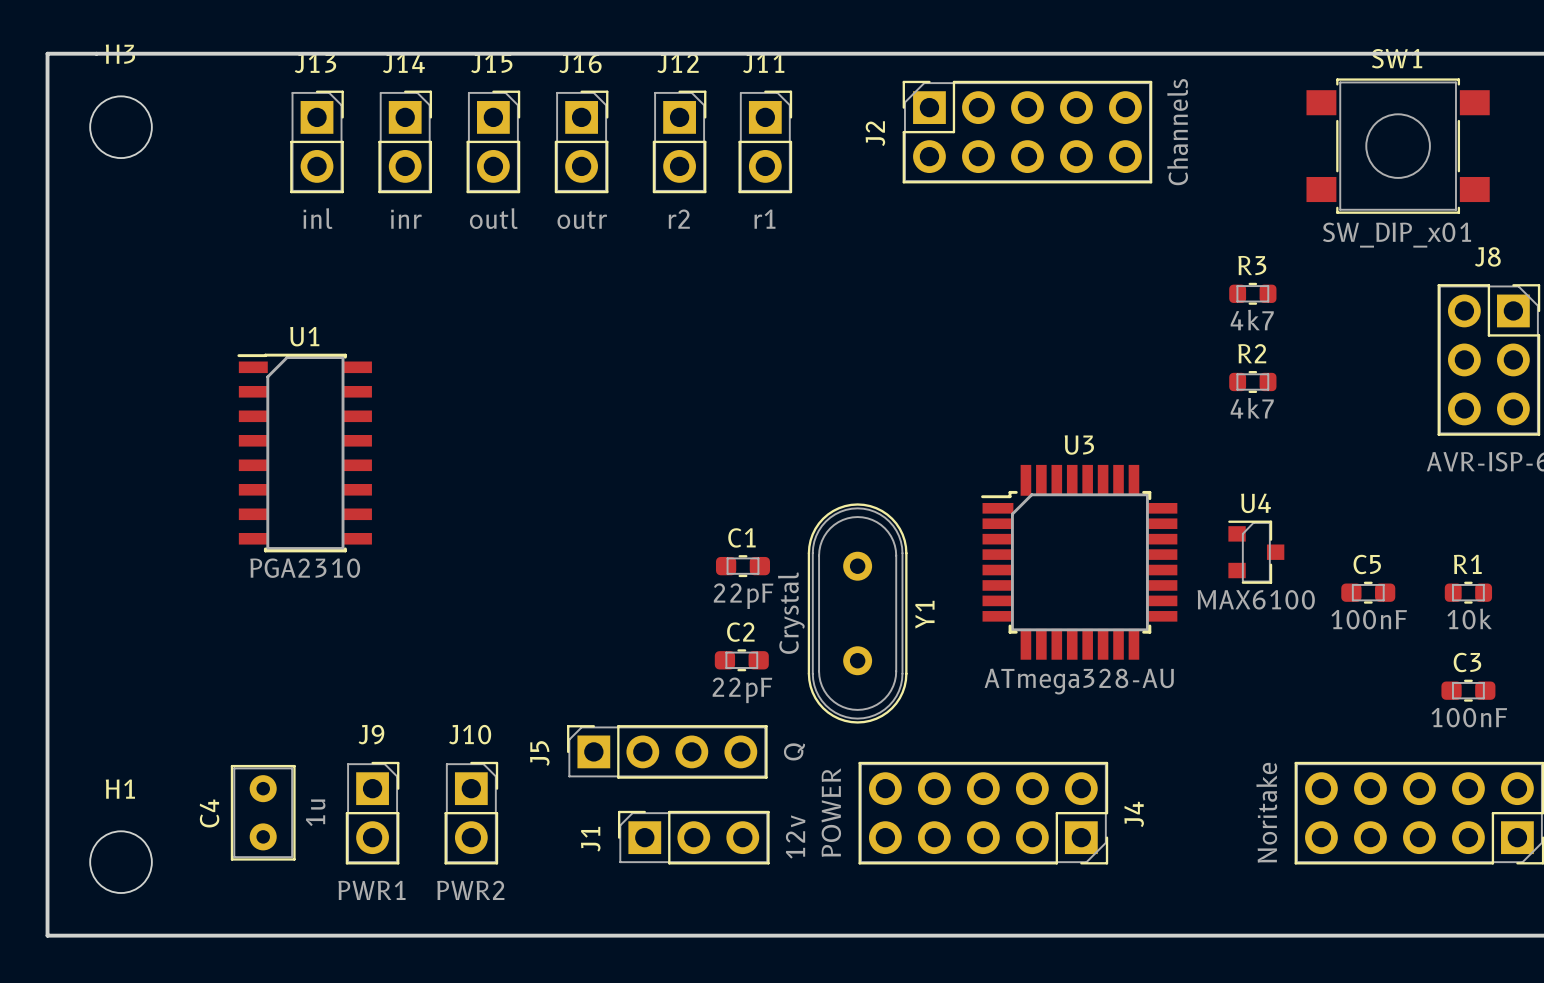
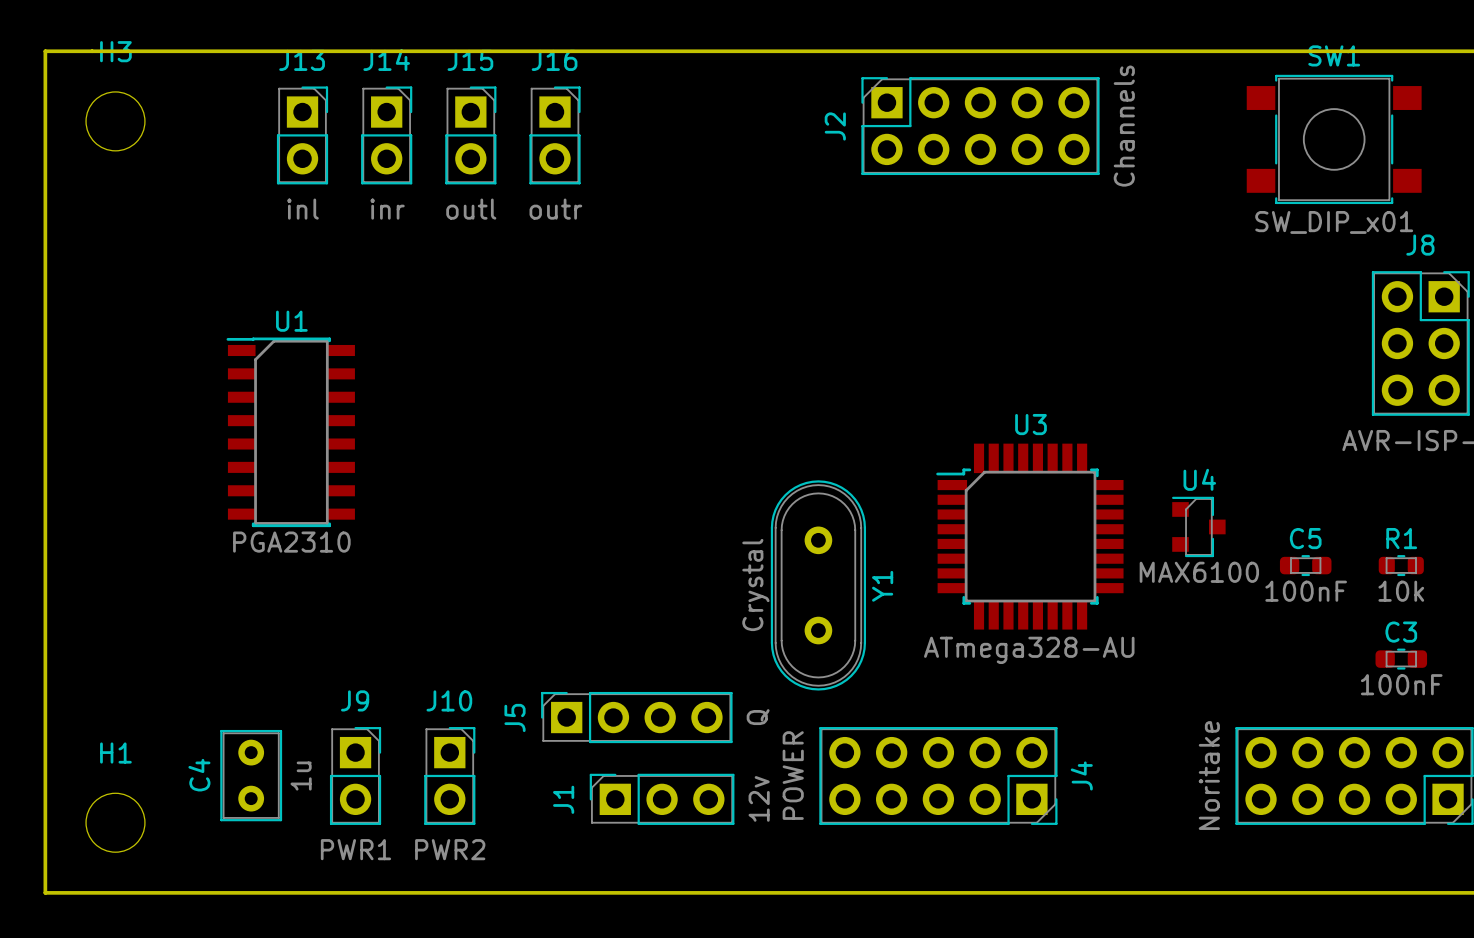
J12: r2 (679, 141) -> none
J11: r1 (765, 141) -> none
R3: 4k7 (1252, 293) -> none
R2: 4k7 (1252, 381) -> none
C1: 22pF (742, 566) -> none
C2: 22pF (741, 660) -> none

